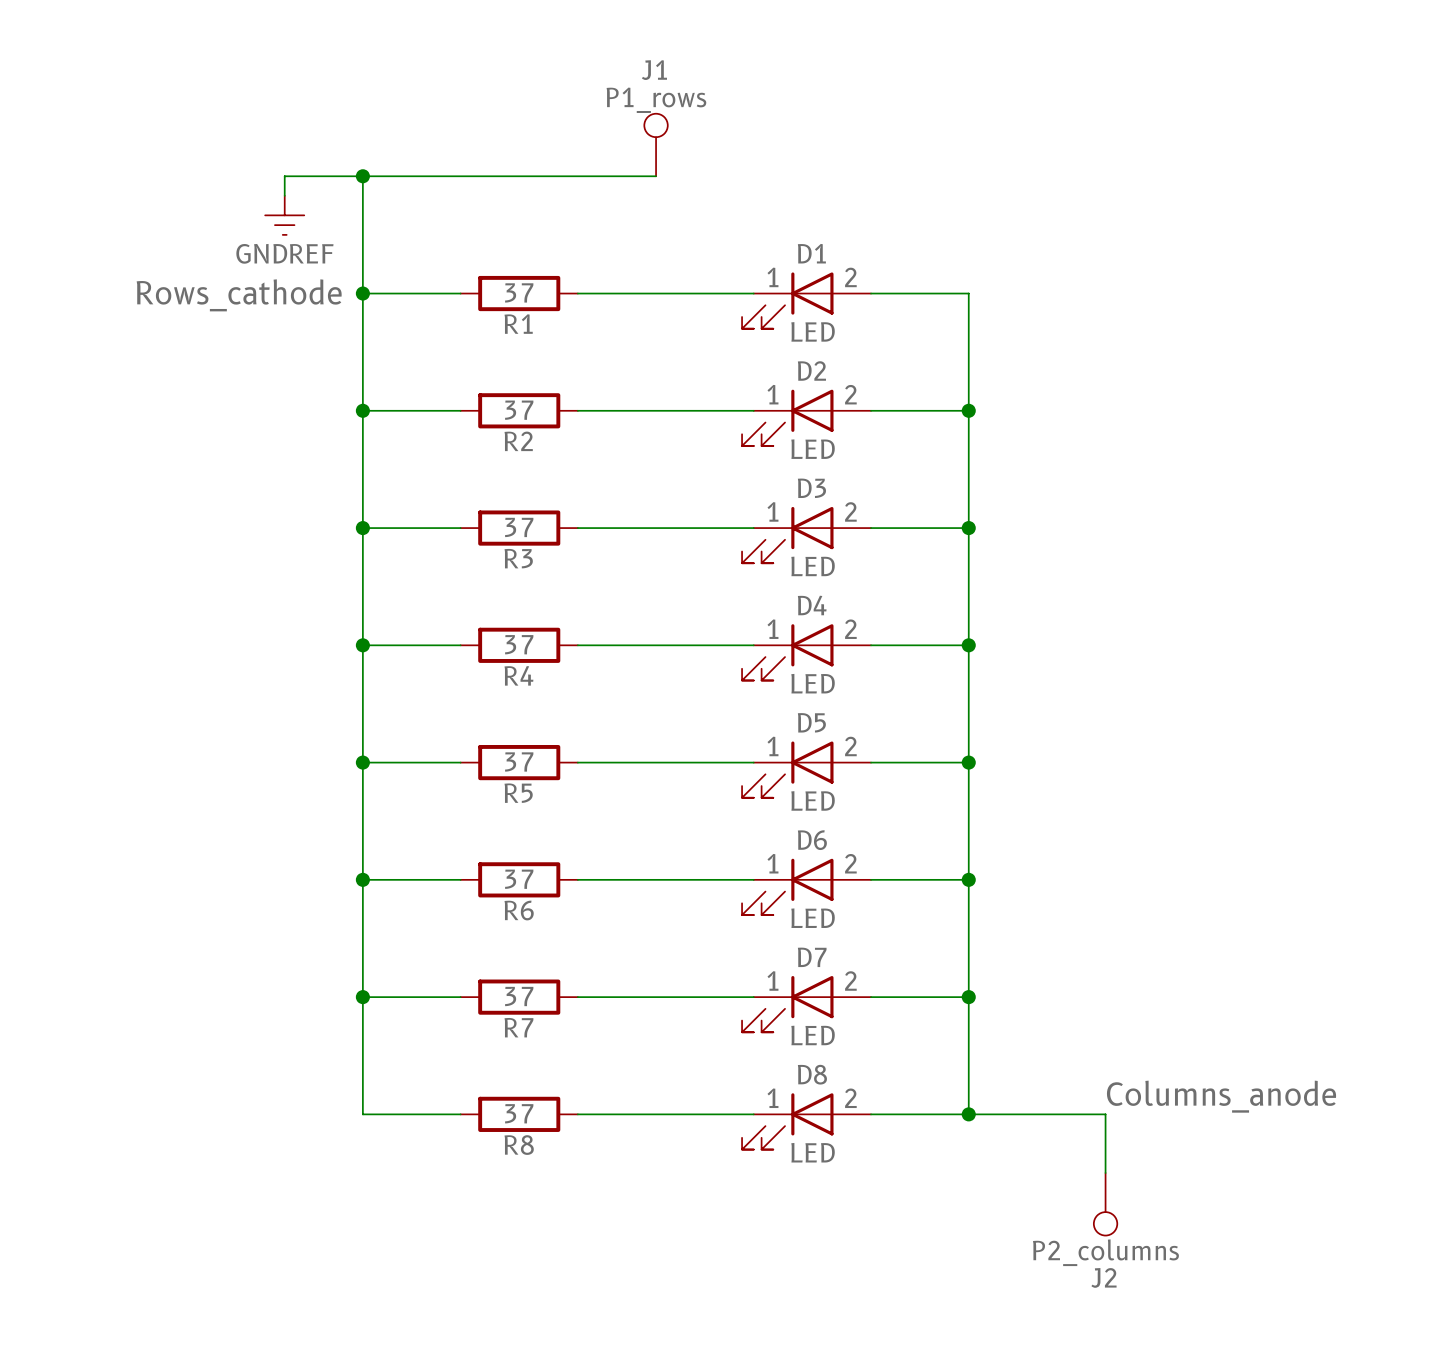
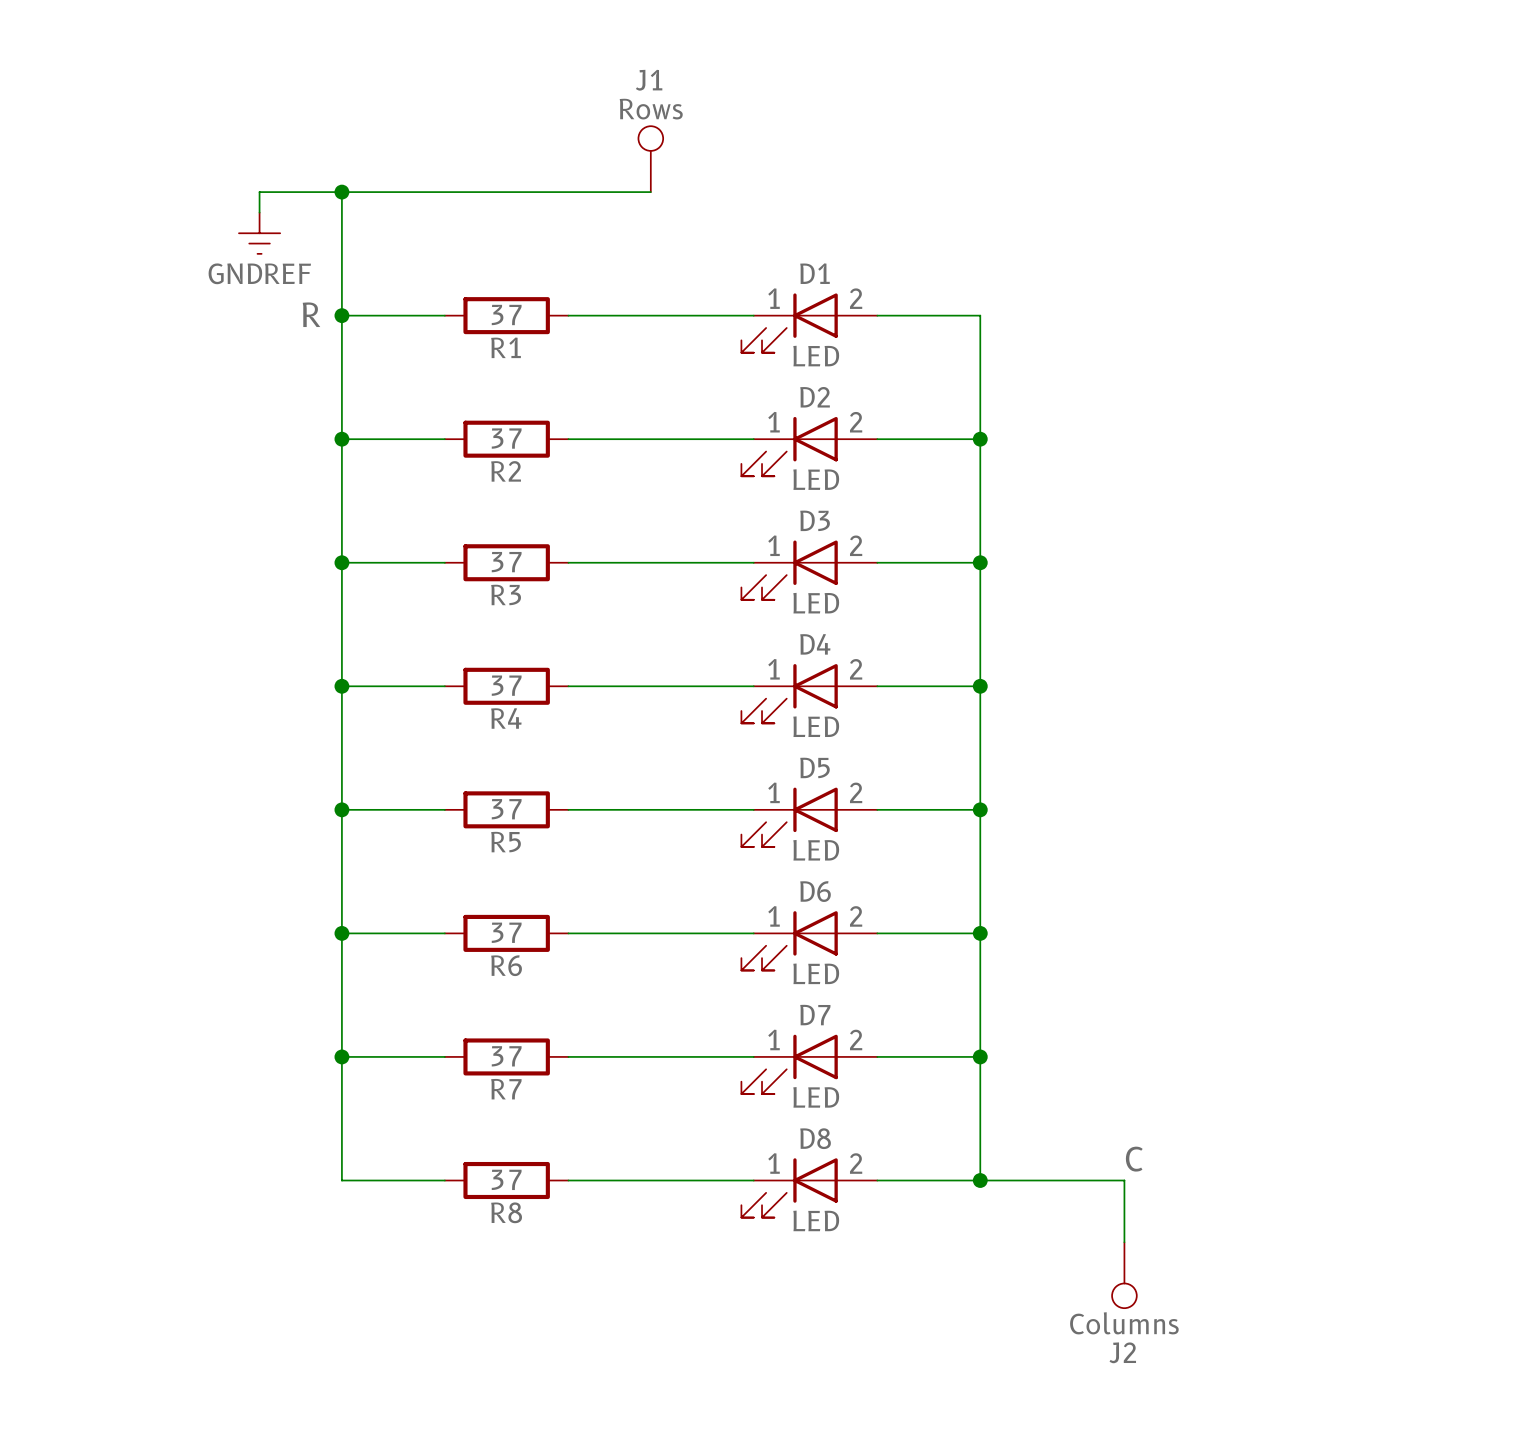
J1 value: P1_rows (656, 100) -> Rows (651, 109)
label: Rows_cathode (239, 295) -> R (311, 314)
label: Columns_anode (1221, 1096) -> C (1134, 1159)
J2 value: P2_columns (1105, 1252) -> Columns (1124, 1323)

